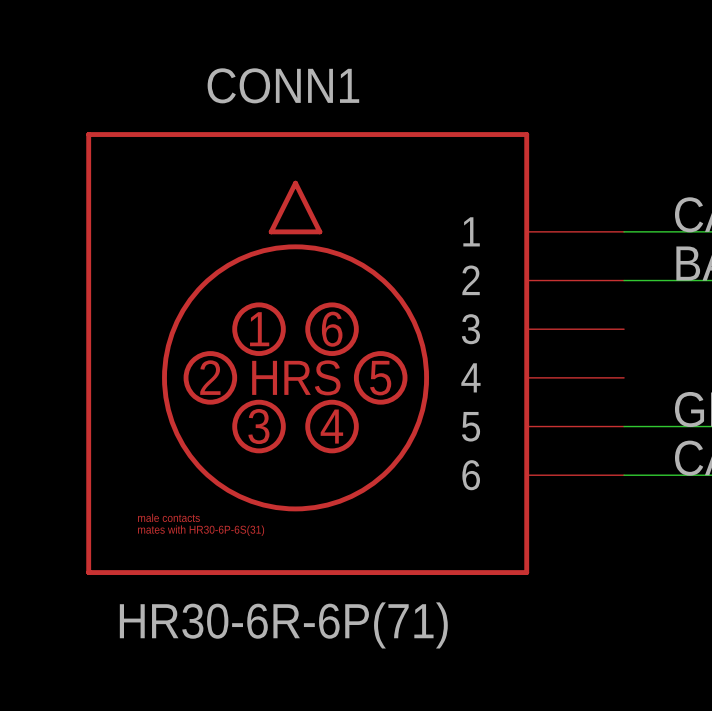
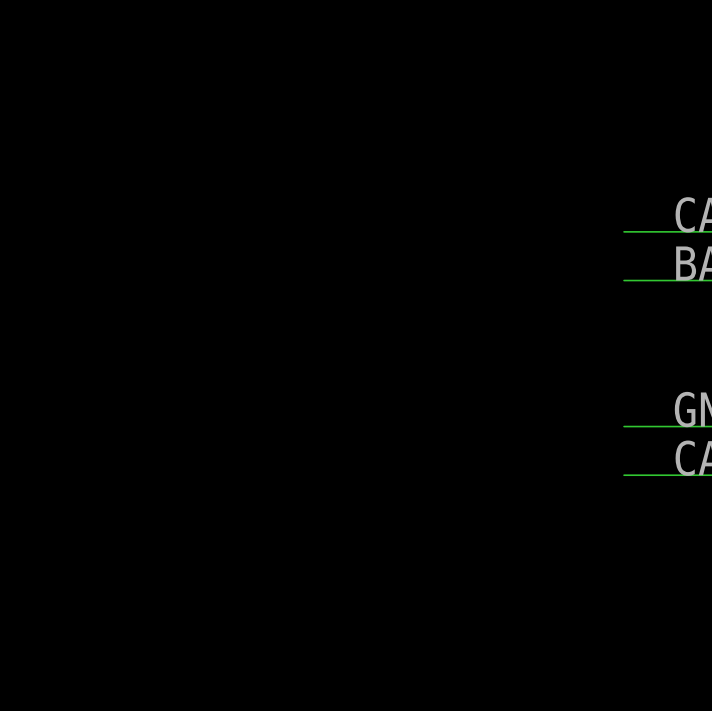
CONN1: HR30-6R-6P(71) (355, 353) -> none

